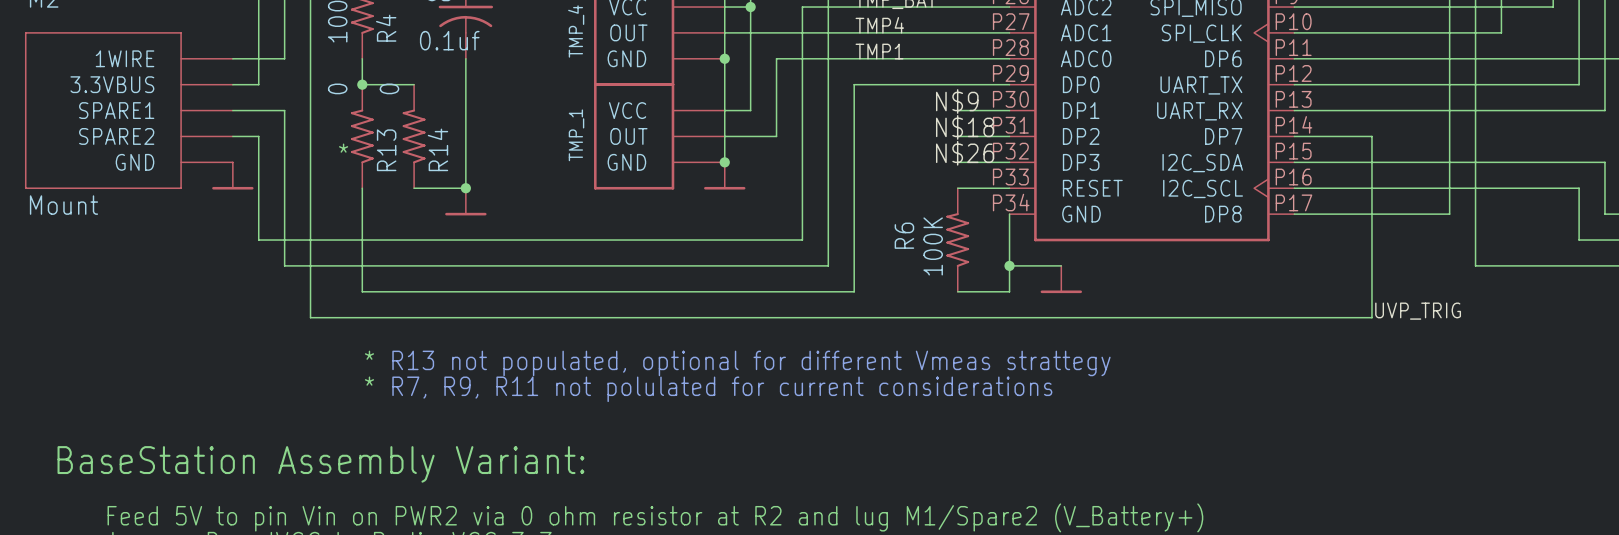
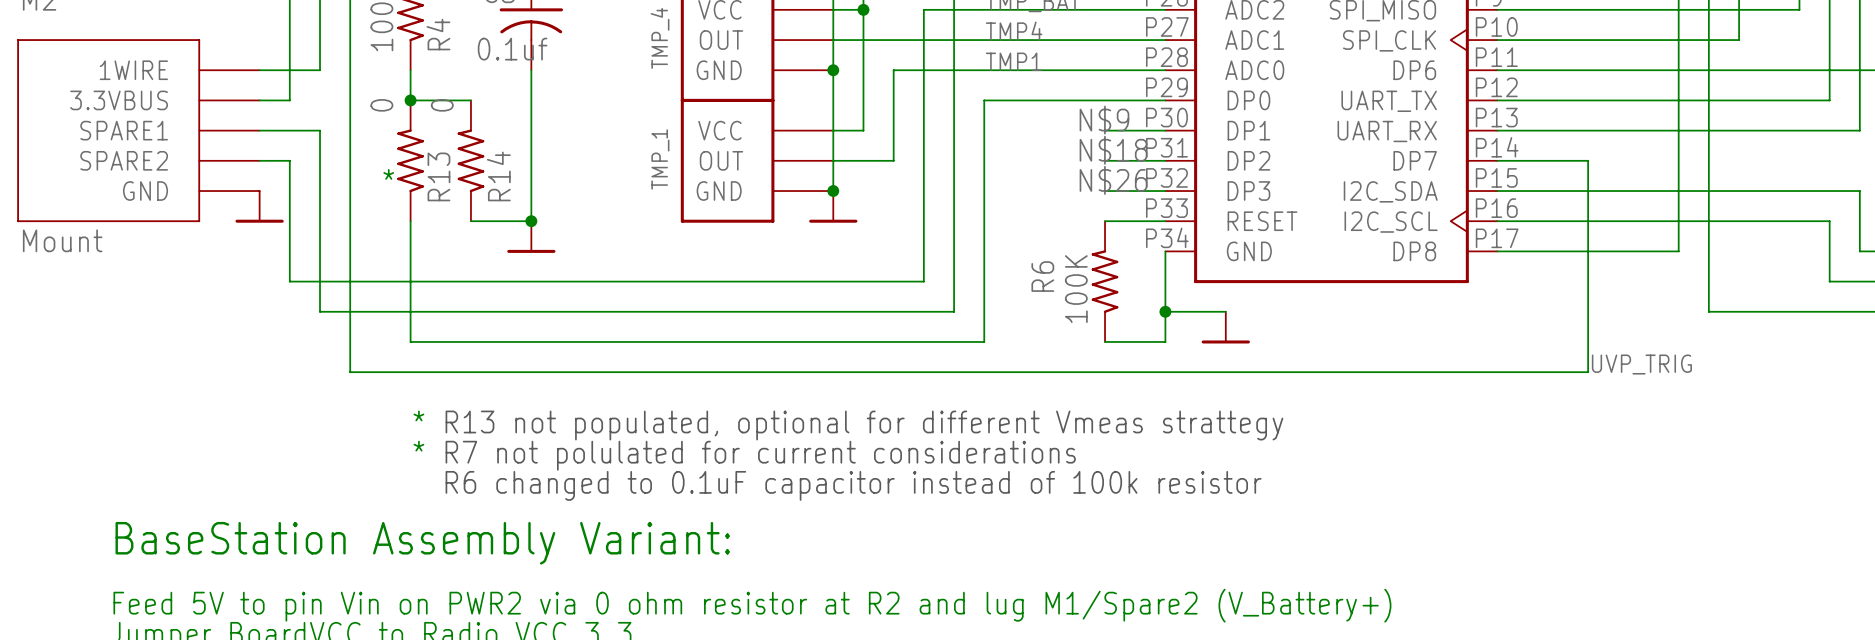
text: R7, R9, R11 not polulated for current considerations (722, 389) -> R7 not polulated for current considerations (760, 455)
text: none -> R6 changed to 0.1uF capacitor instead of 100k resistor (853, 485)
text position: BaseStation Assembly Variant: (320, 464) -> BaseStation Assembly Variant: (422, 543)

